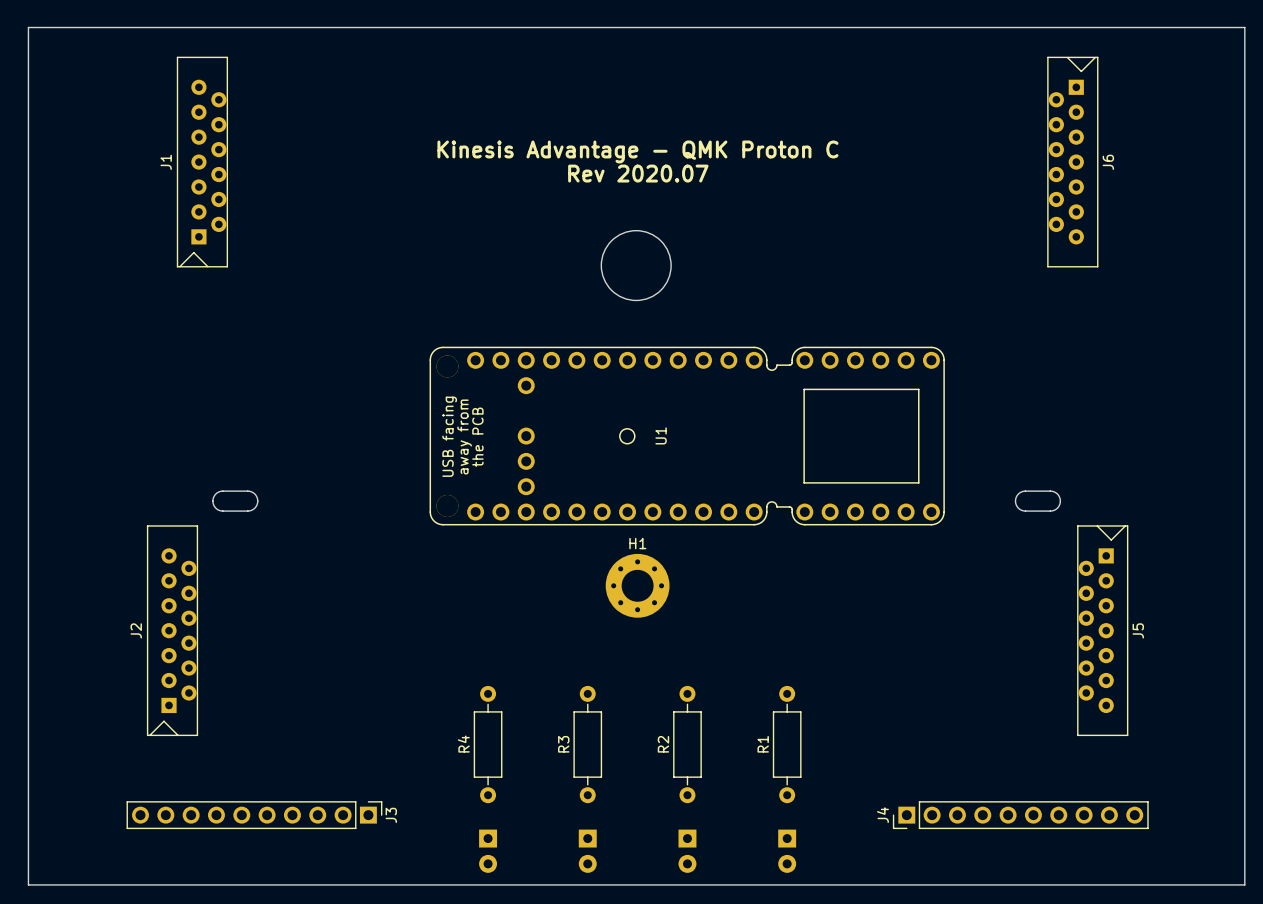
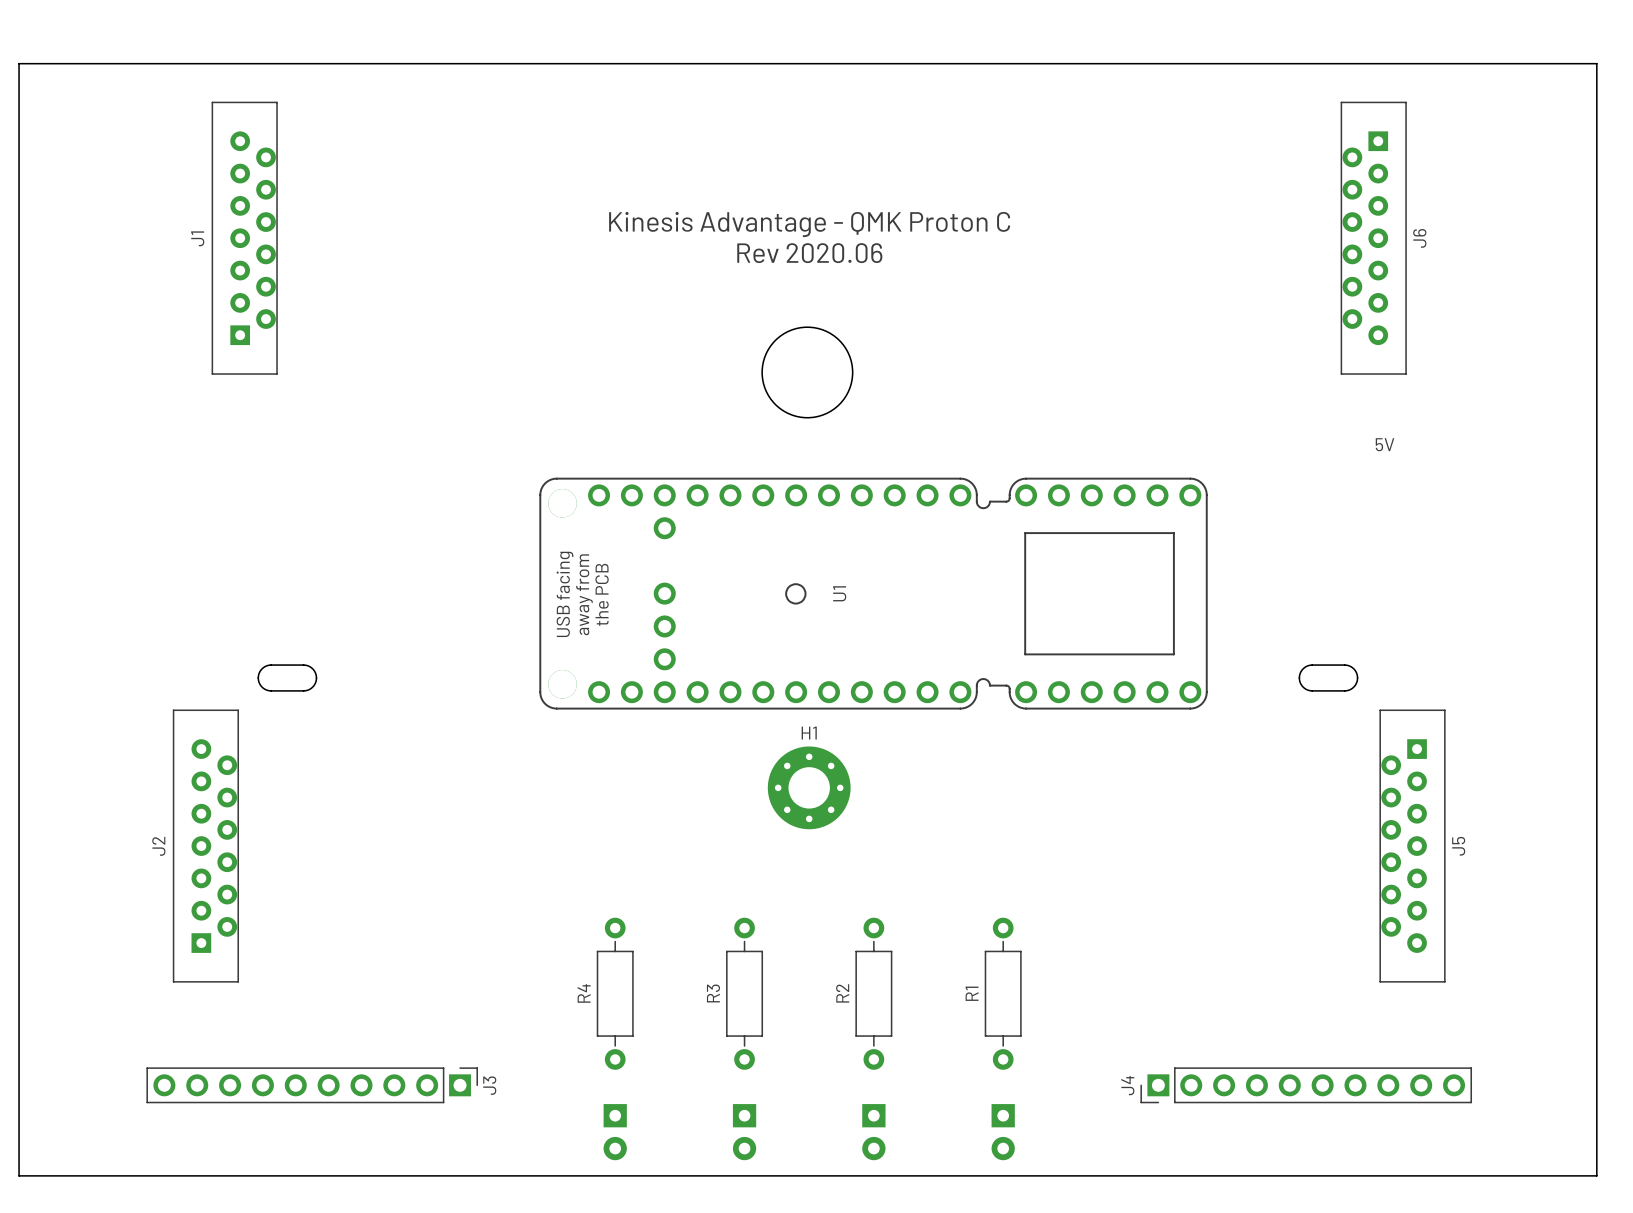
J1 footprint: [176, 56, 228, 268] -> [211, 101, 278, 375]
J6 footprint: [1047, 56, 1099, 268] -> [1340, 101, 1407, 375]
text: Rev 2020.07 (638, 173) -> Rev 2020.06 (809, 253)
text: none -> 5V (1385, 444)
J2 footprint: [146, 525, 199, 736] -> [172, 709, 240, 983]
J5 footprint: [1077, 525, 1129, 736] -> [1379, 709, 1446, 983]

